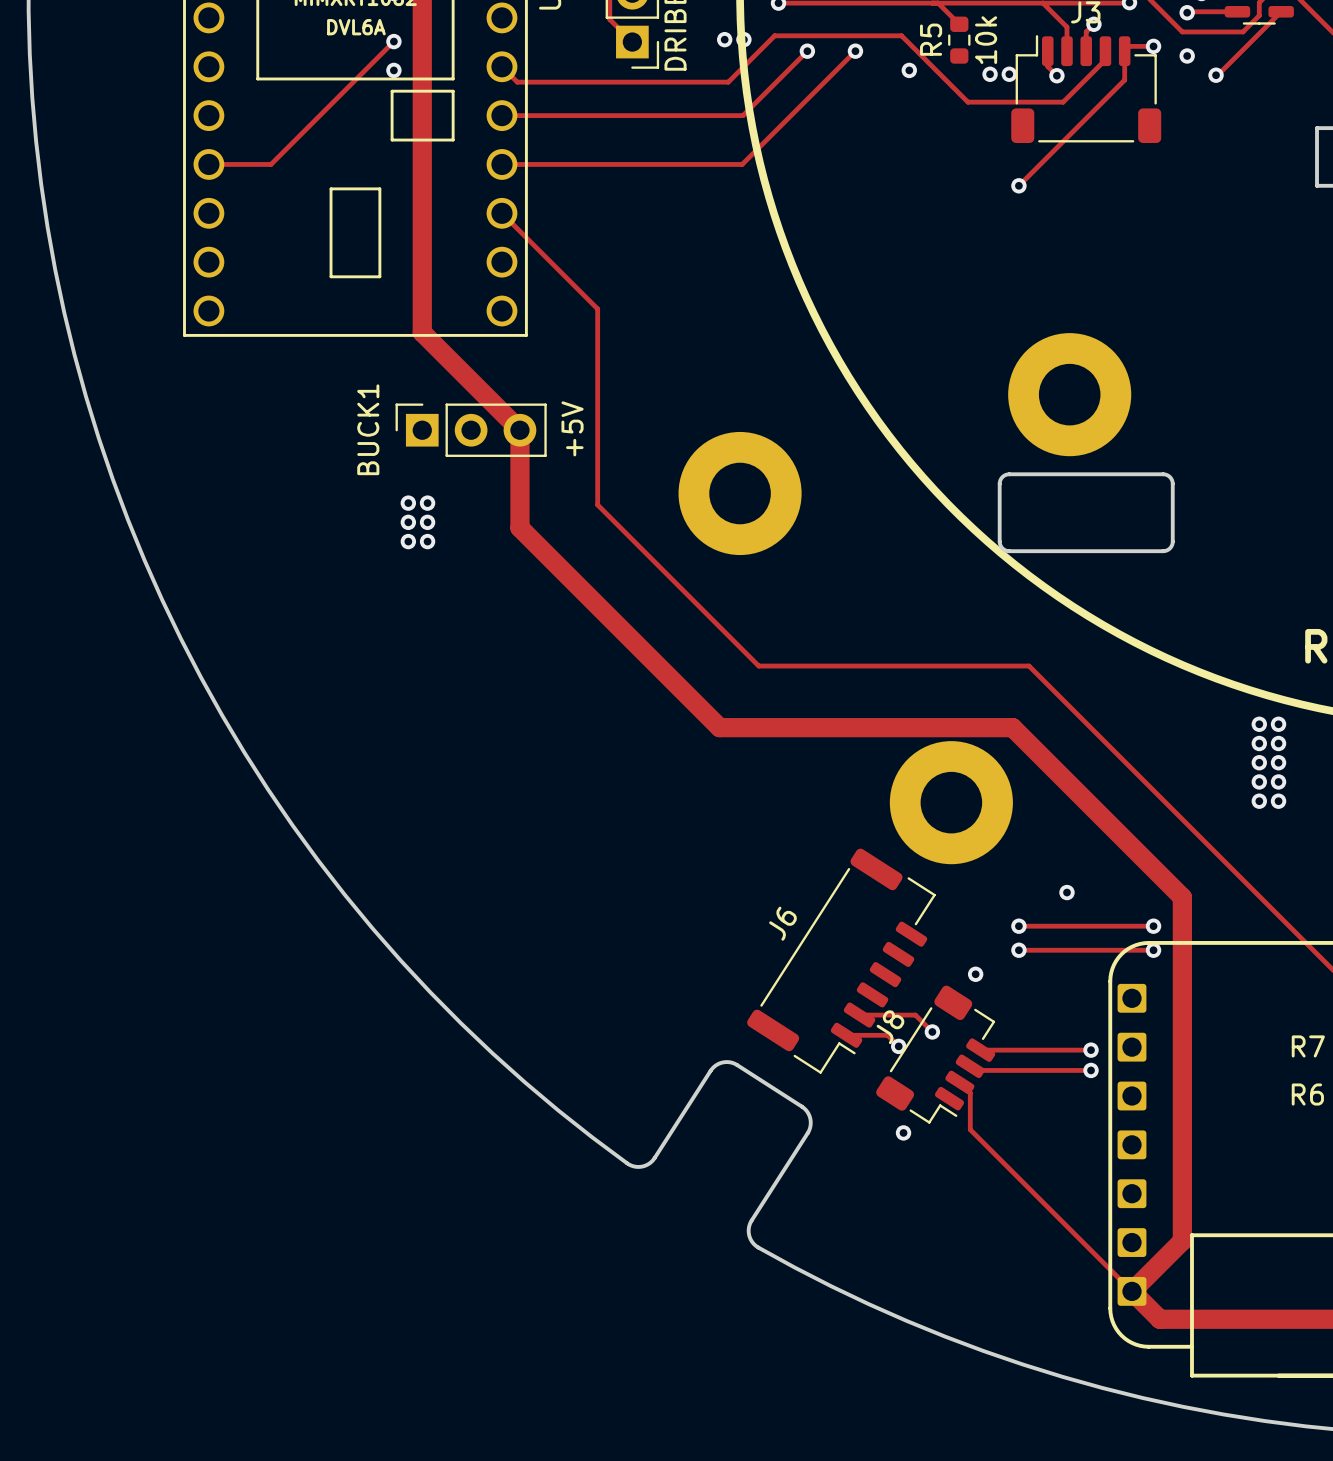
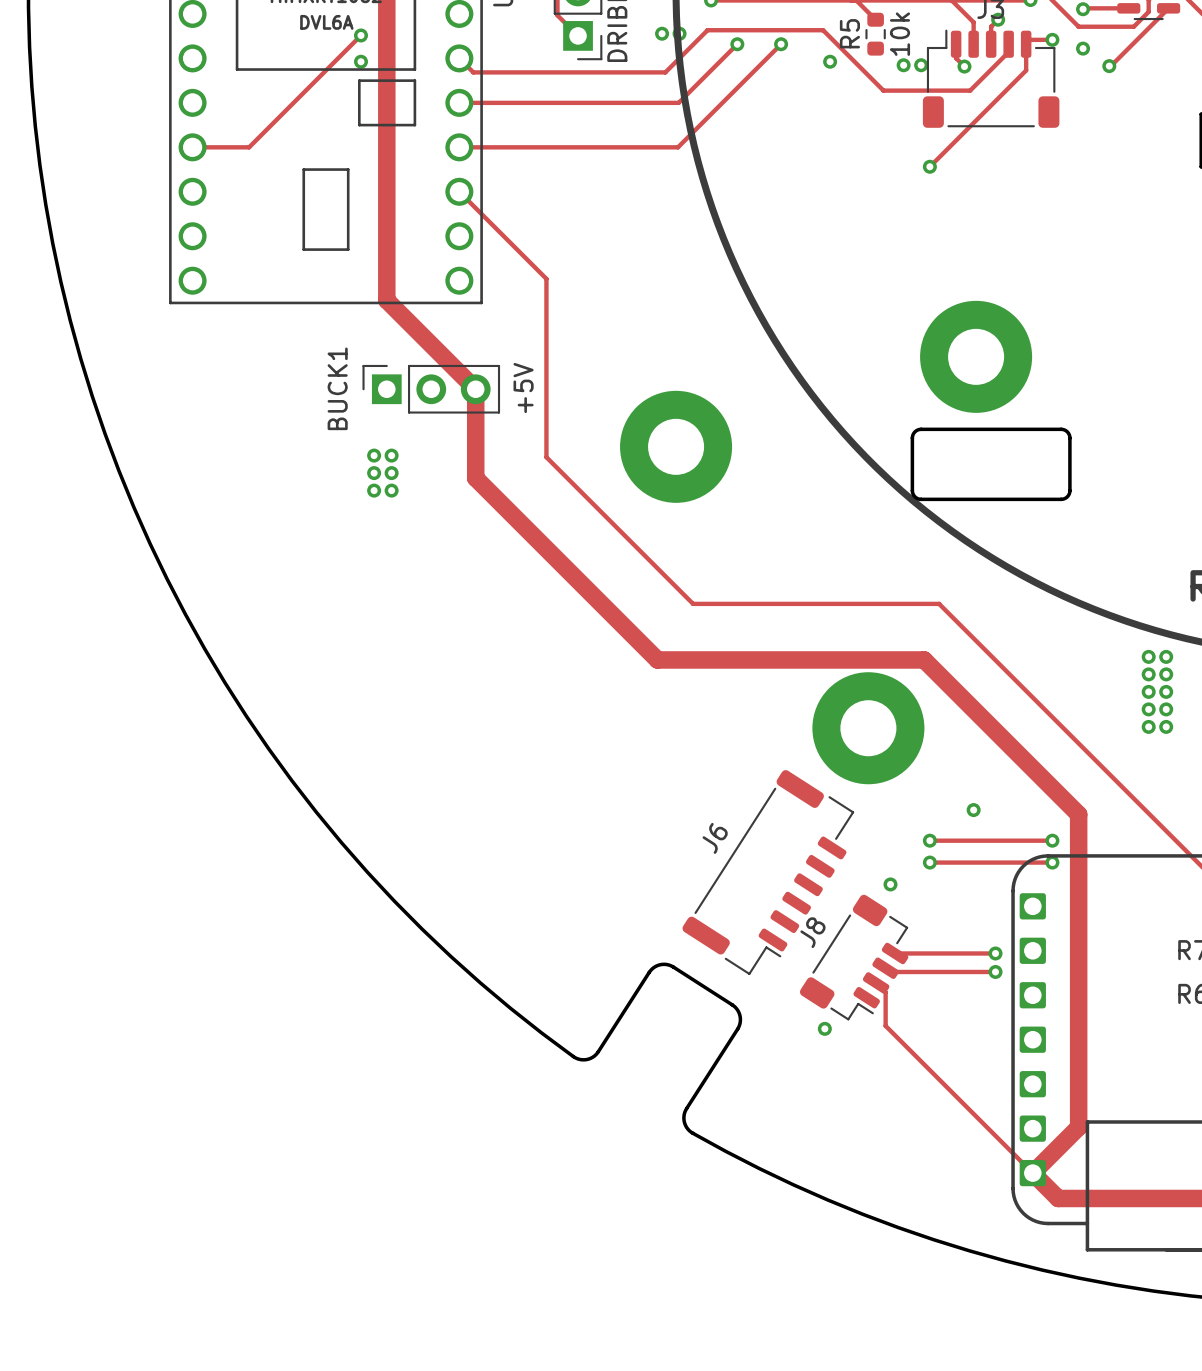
track: (859, 1015) (915, 1015) (932, 1031) -> none
via: (932, 1031) -> none
track: (846, 1035) (887, 1035) (898, 1046) -> none
via: (898, 1046) -> none

